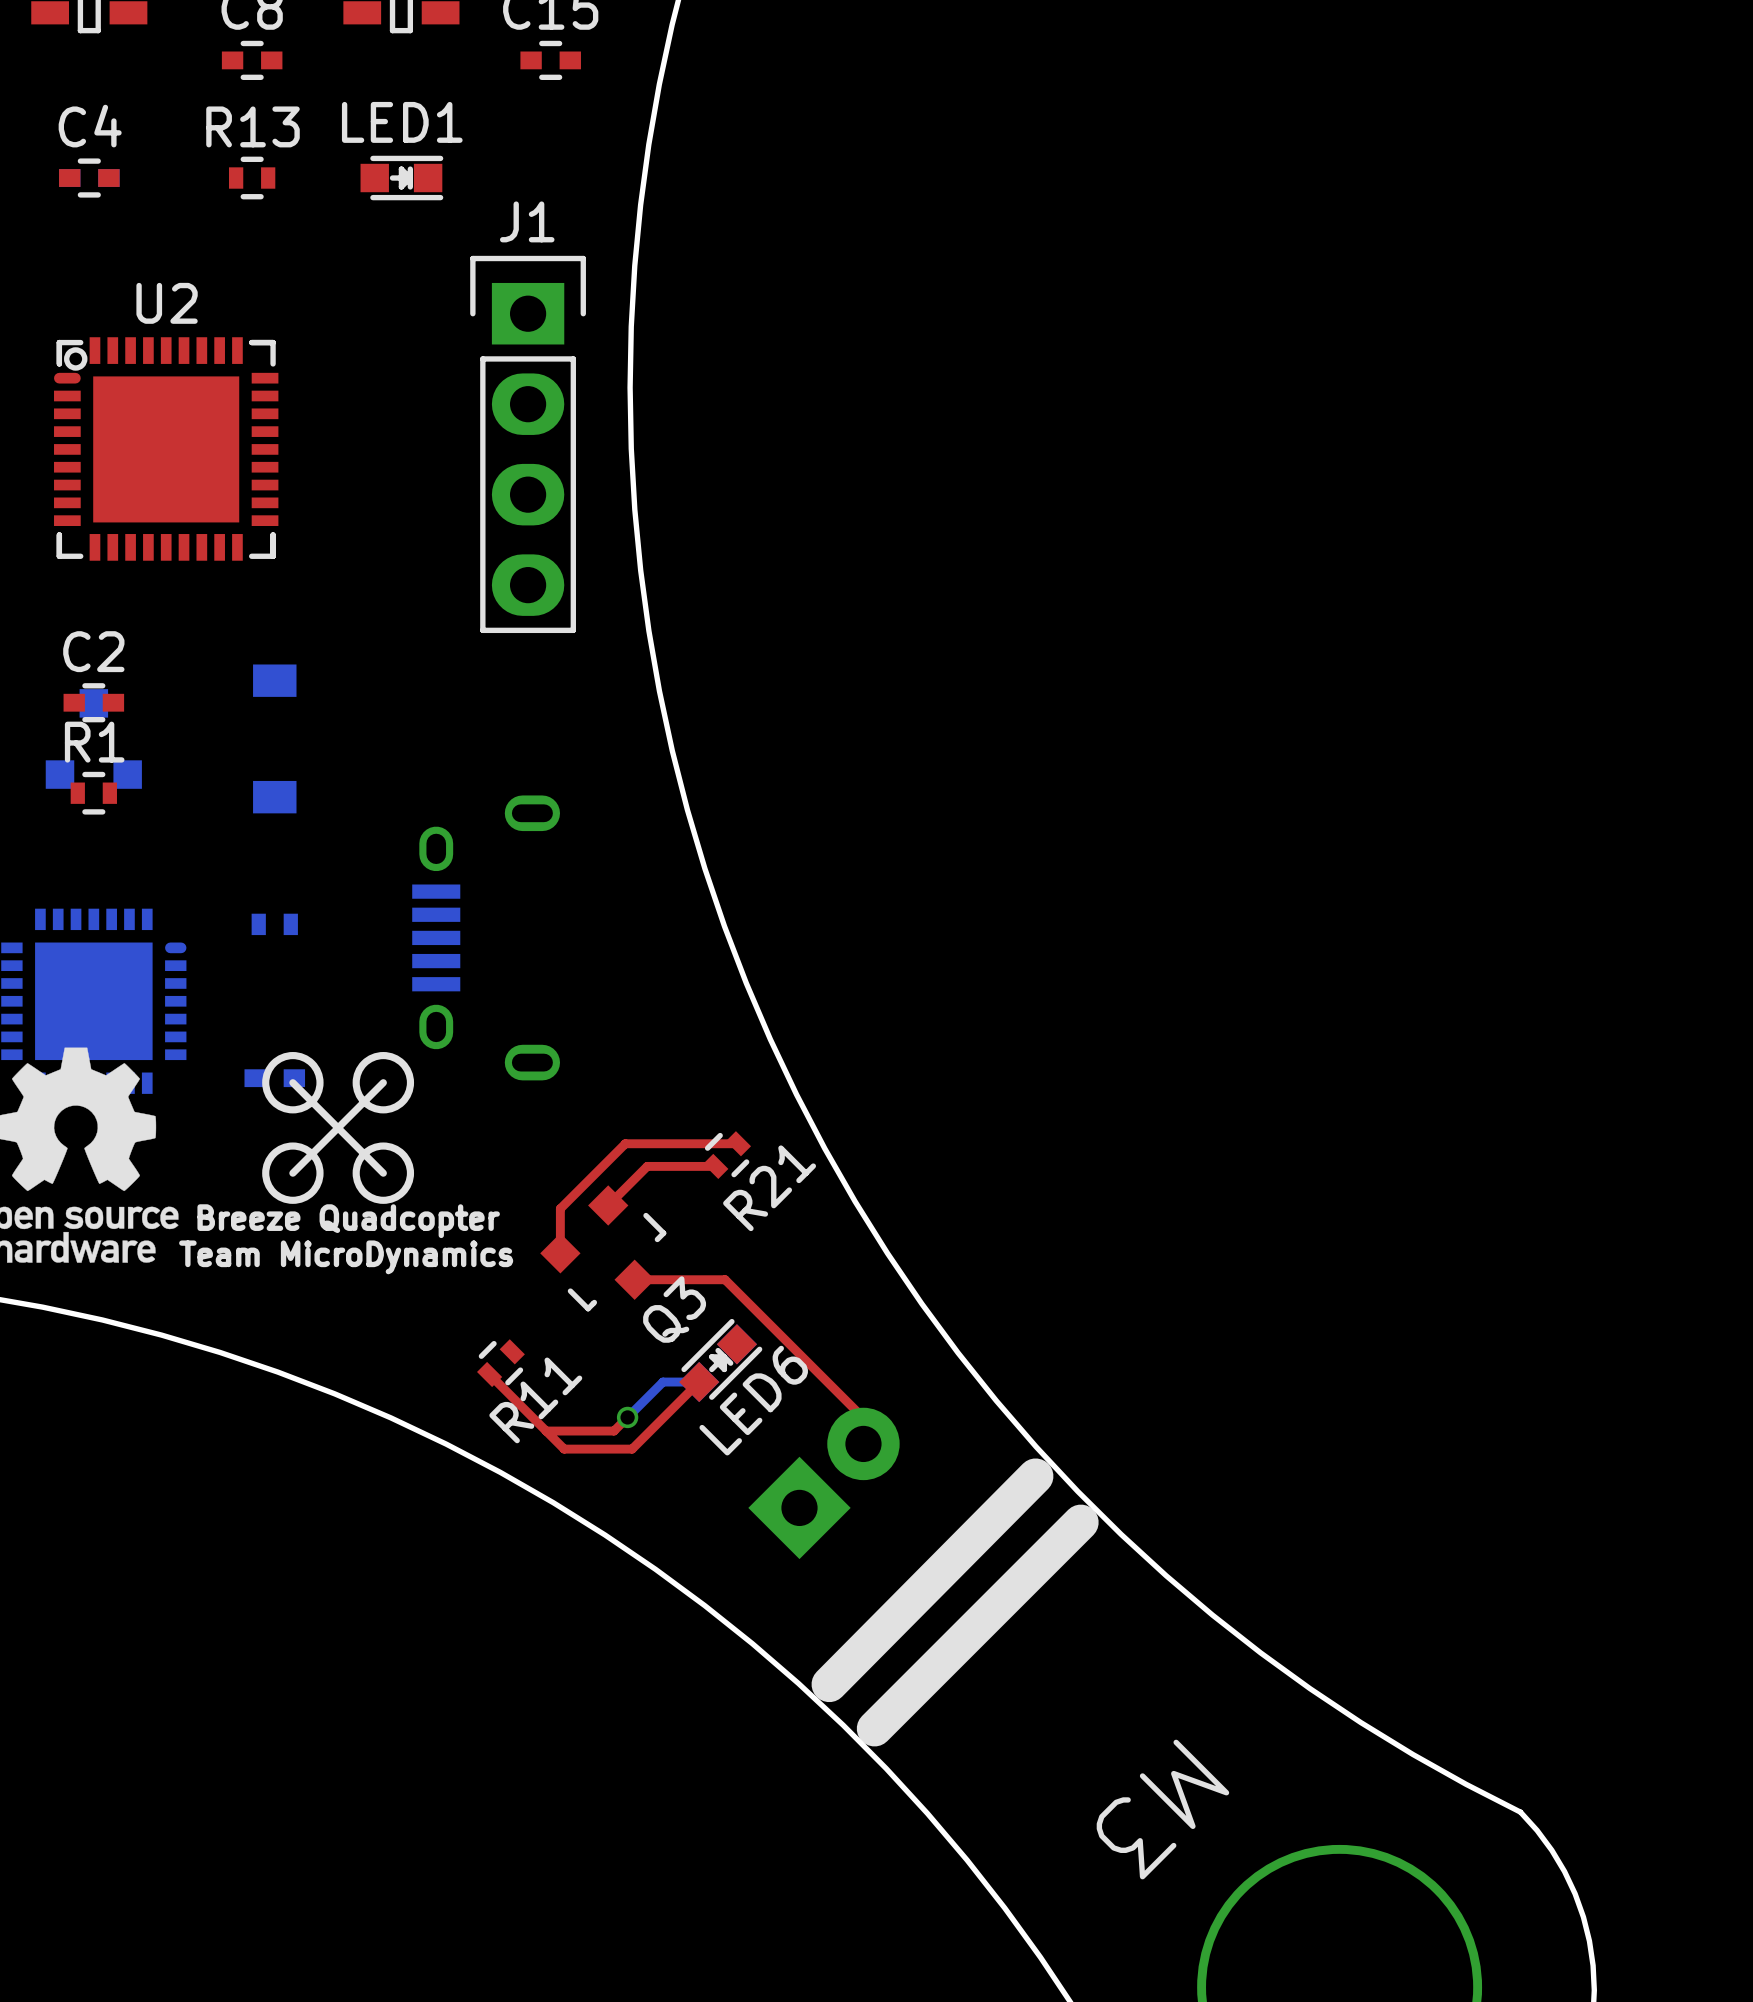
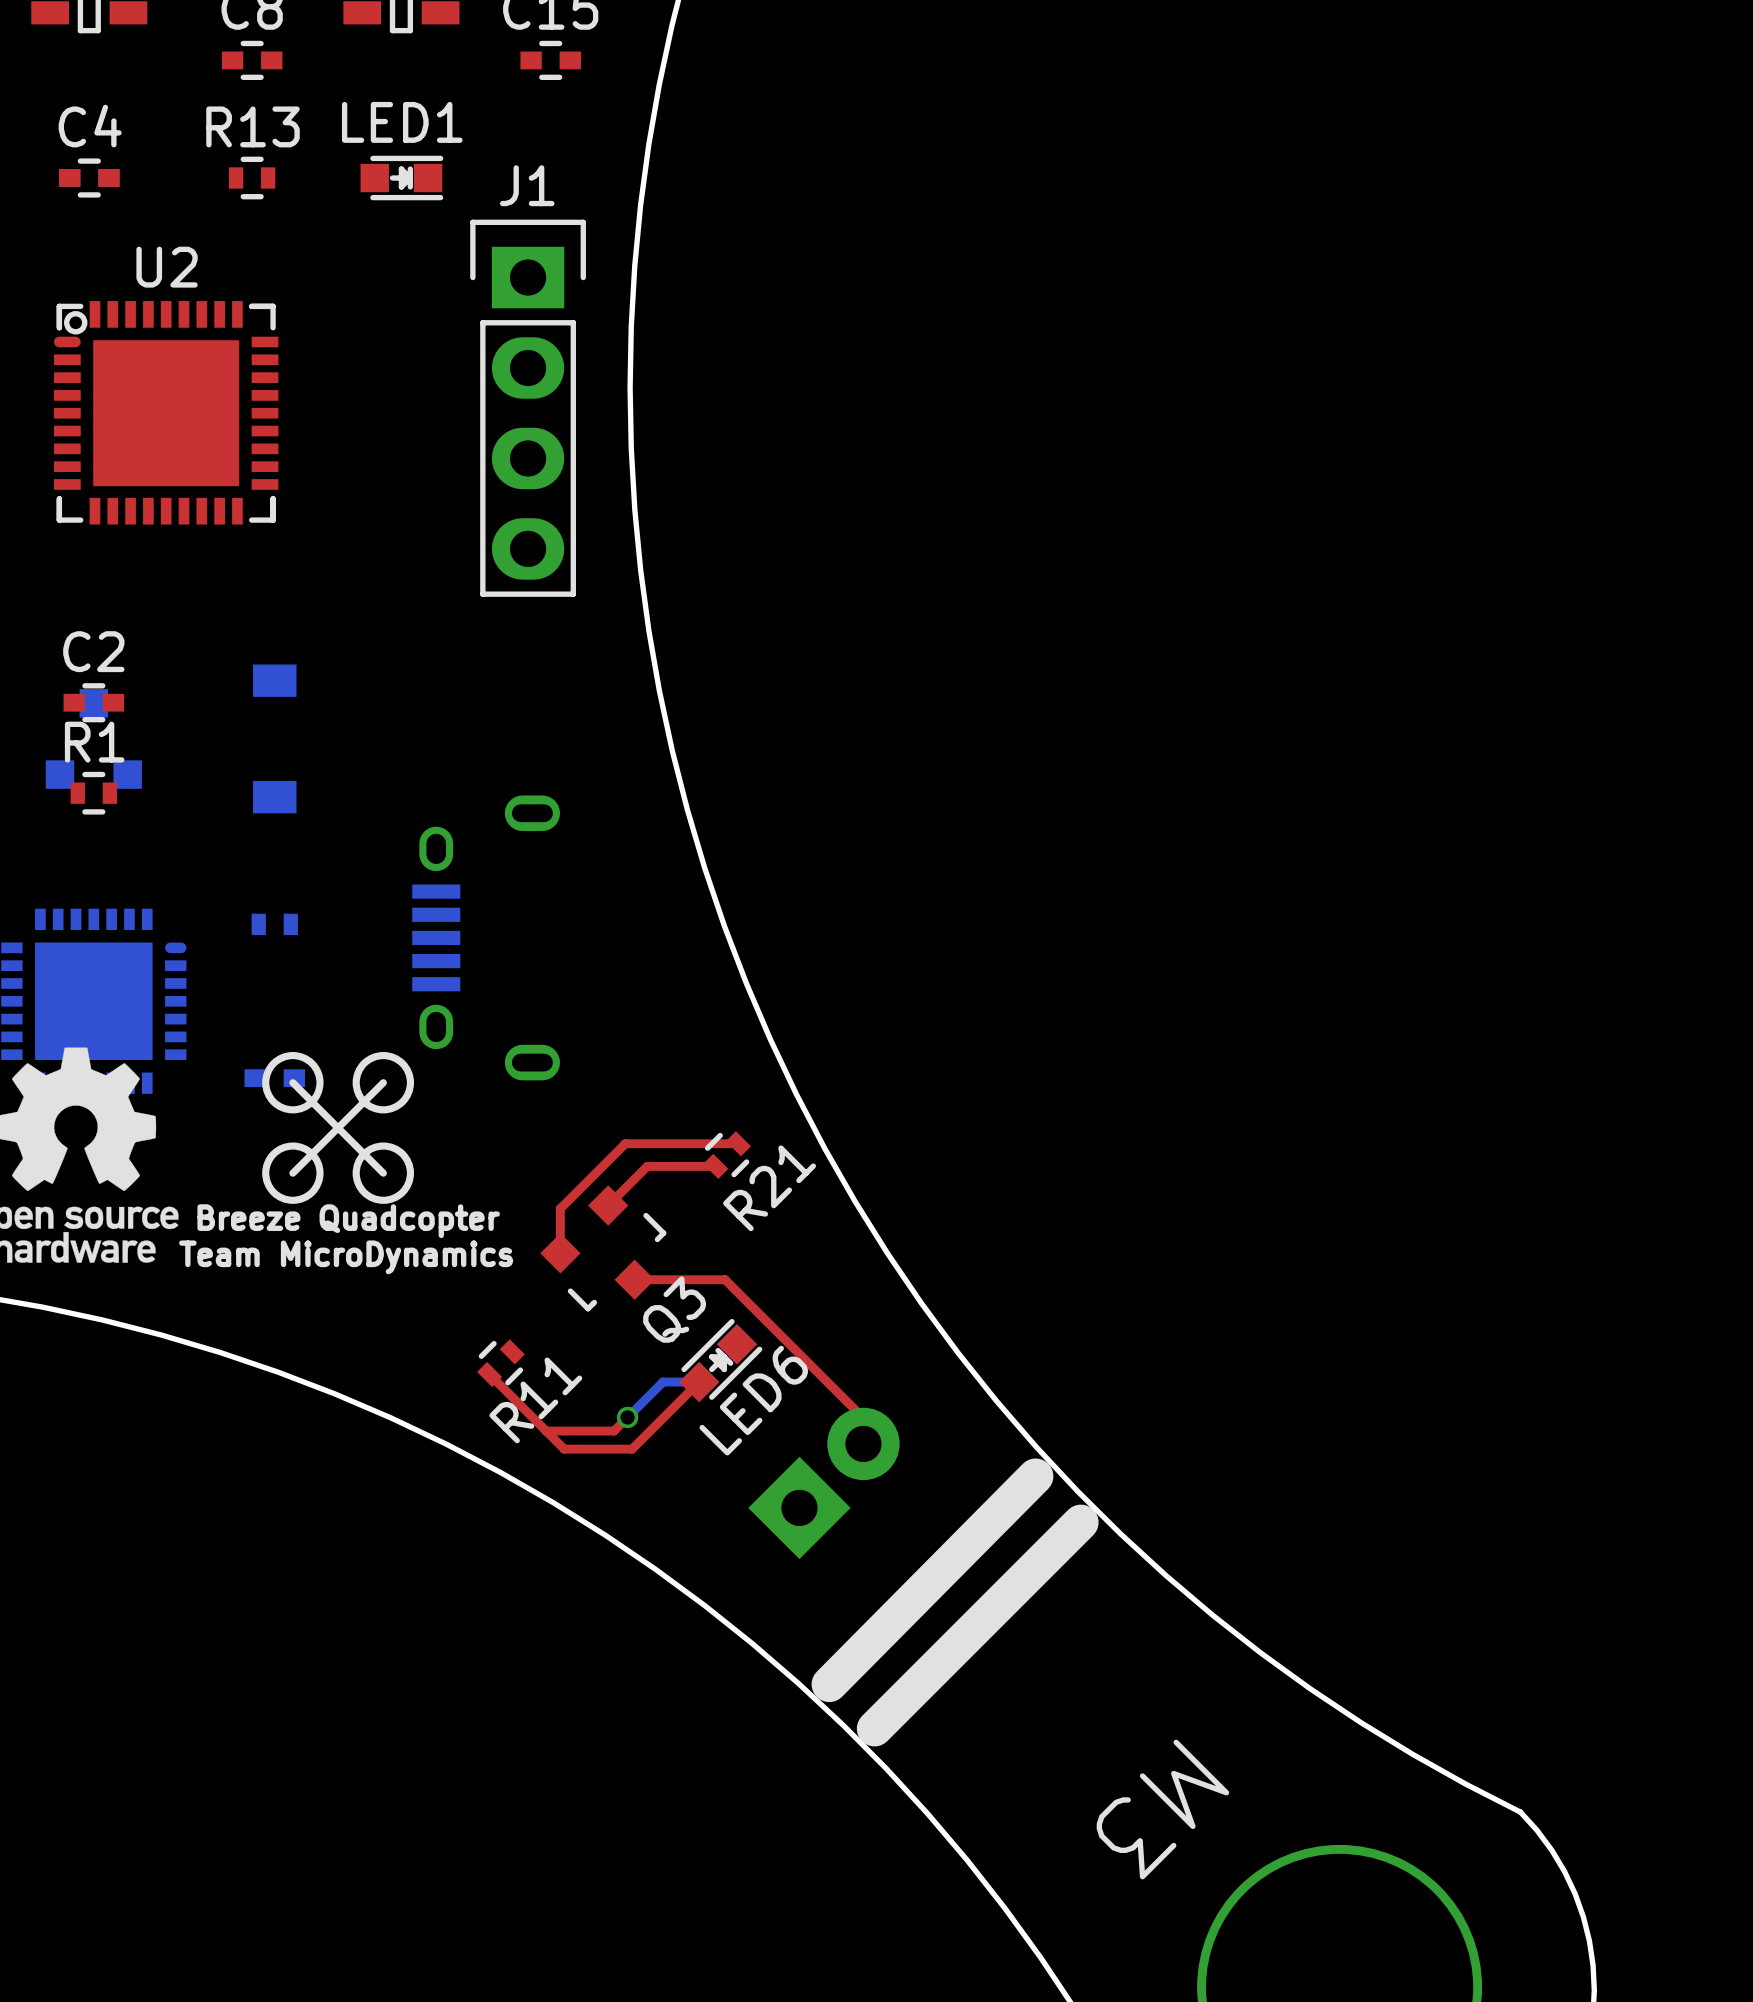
J1 position: (528, 444) -> (528, 408)
U2 position: (166, 448) -> (166, 412)

